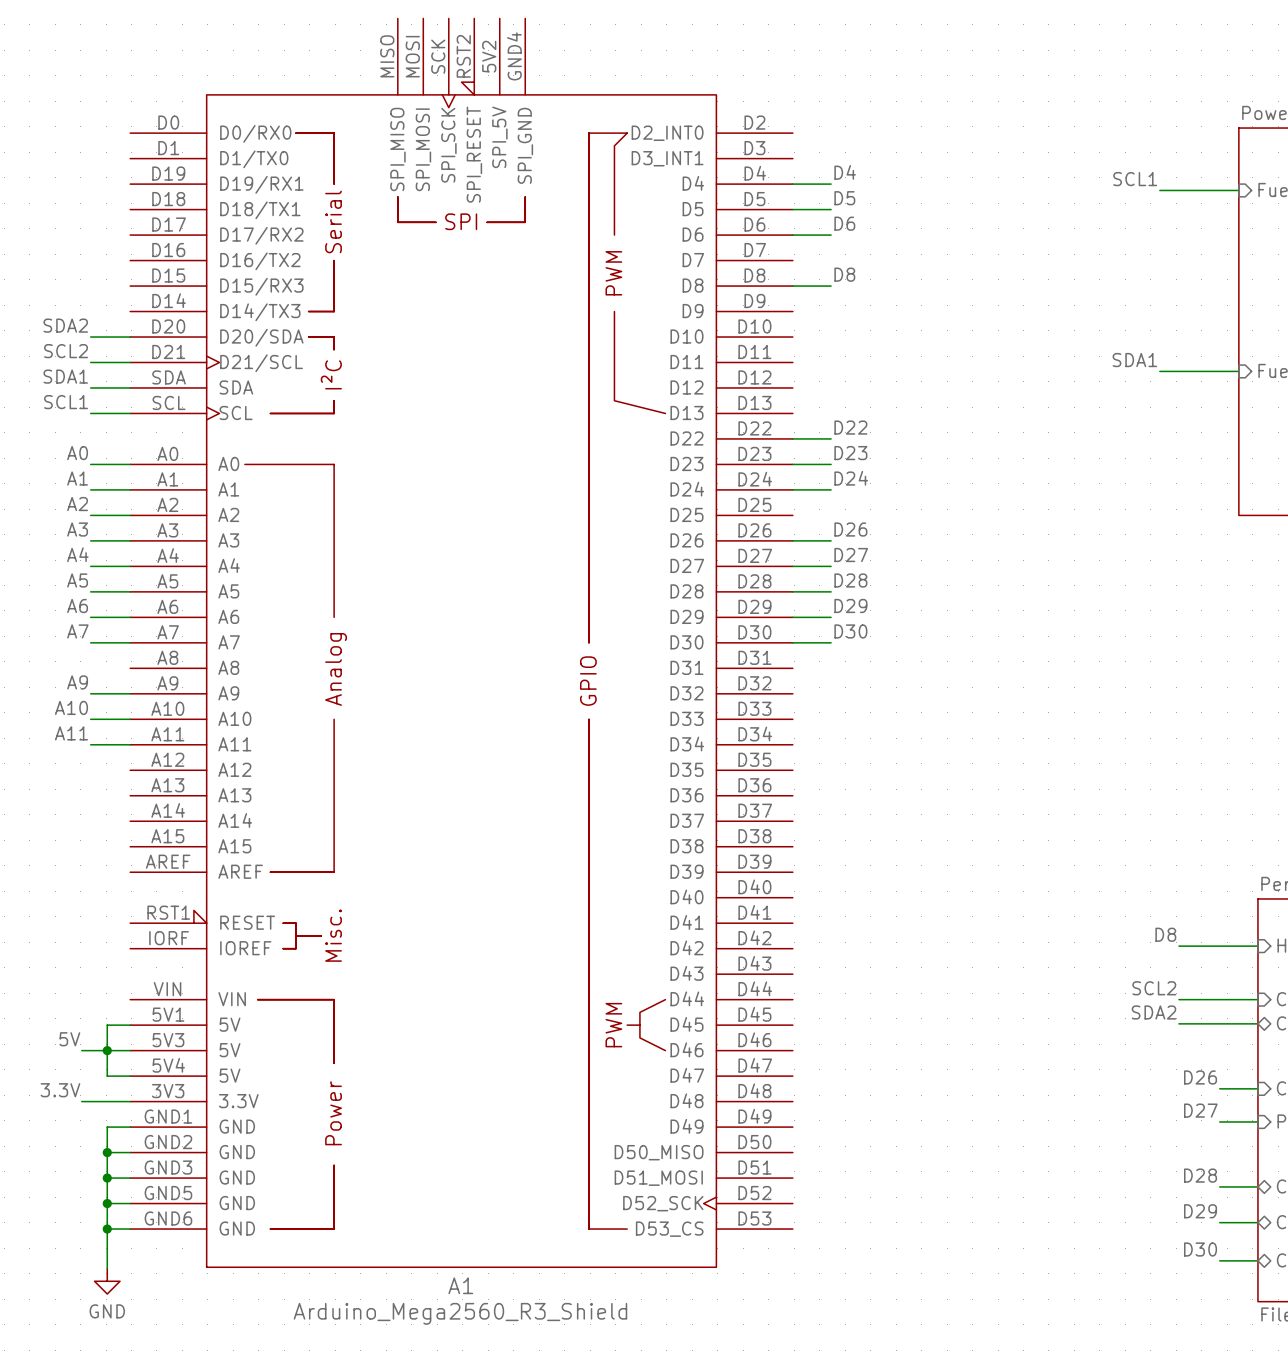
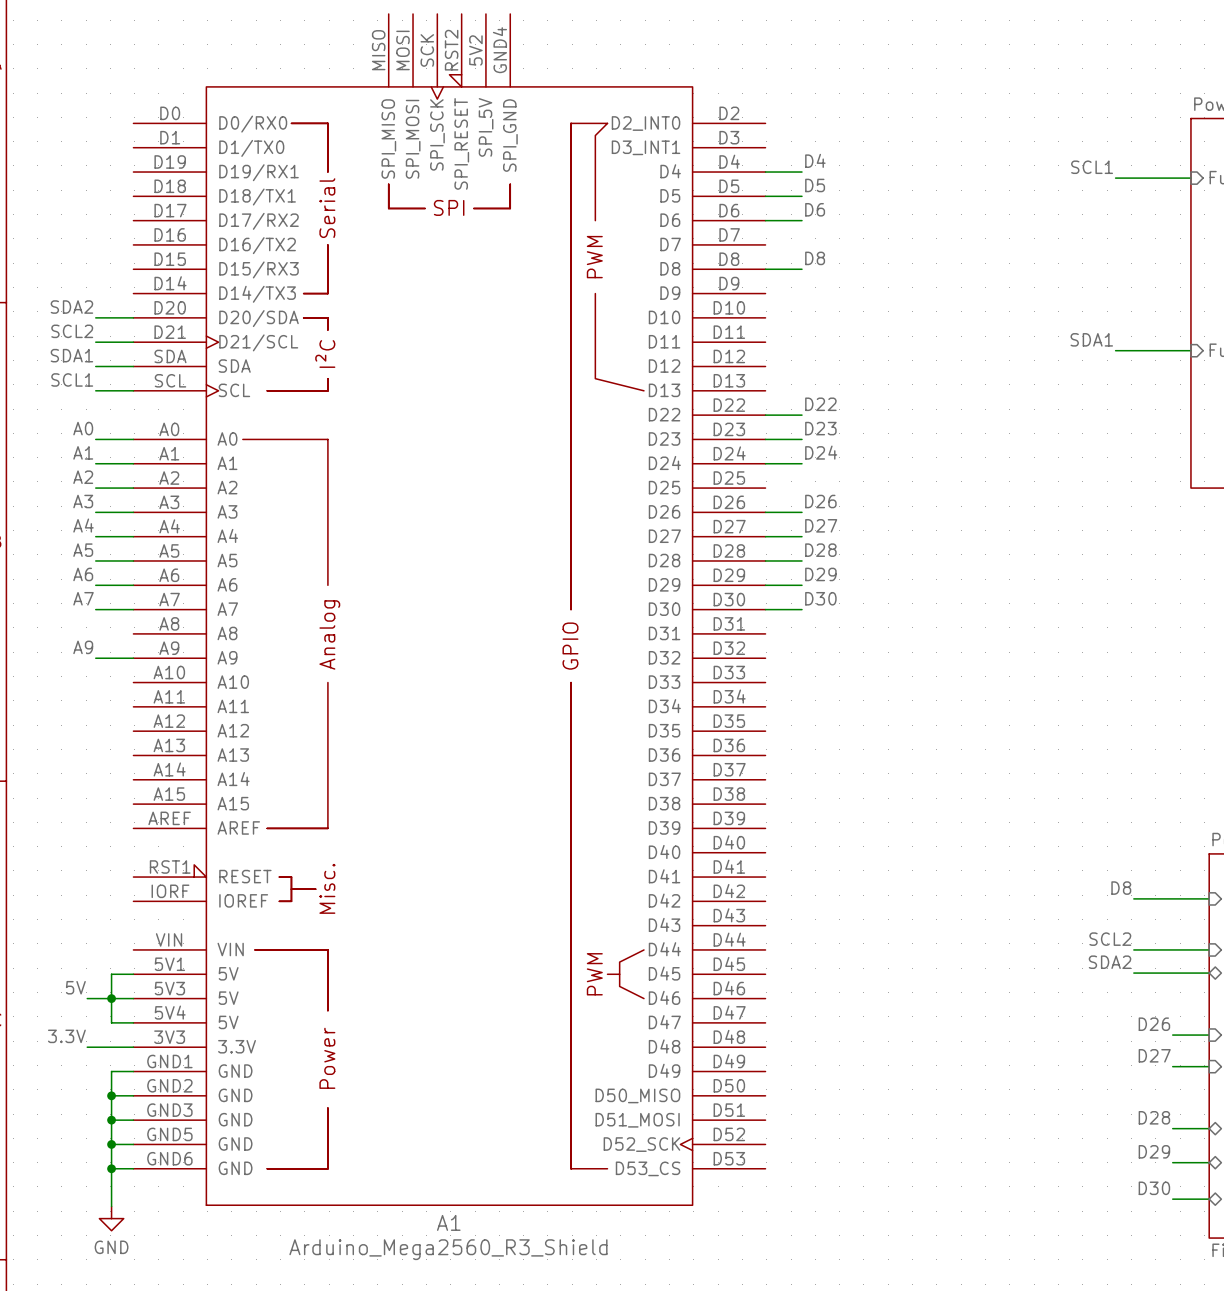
label: A10 (71, 707) -> none
wire: (90, 719) (130, 719) -> none
label: A11 (71, 733) -> none
wire: (90, 744) (130, 744) -> none

